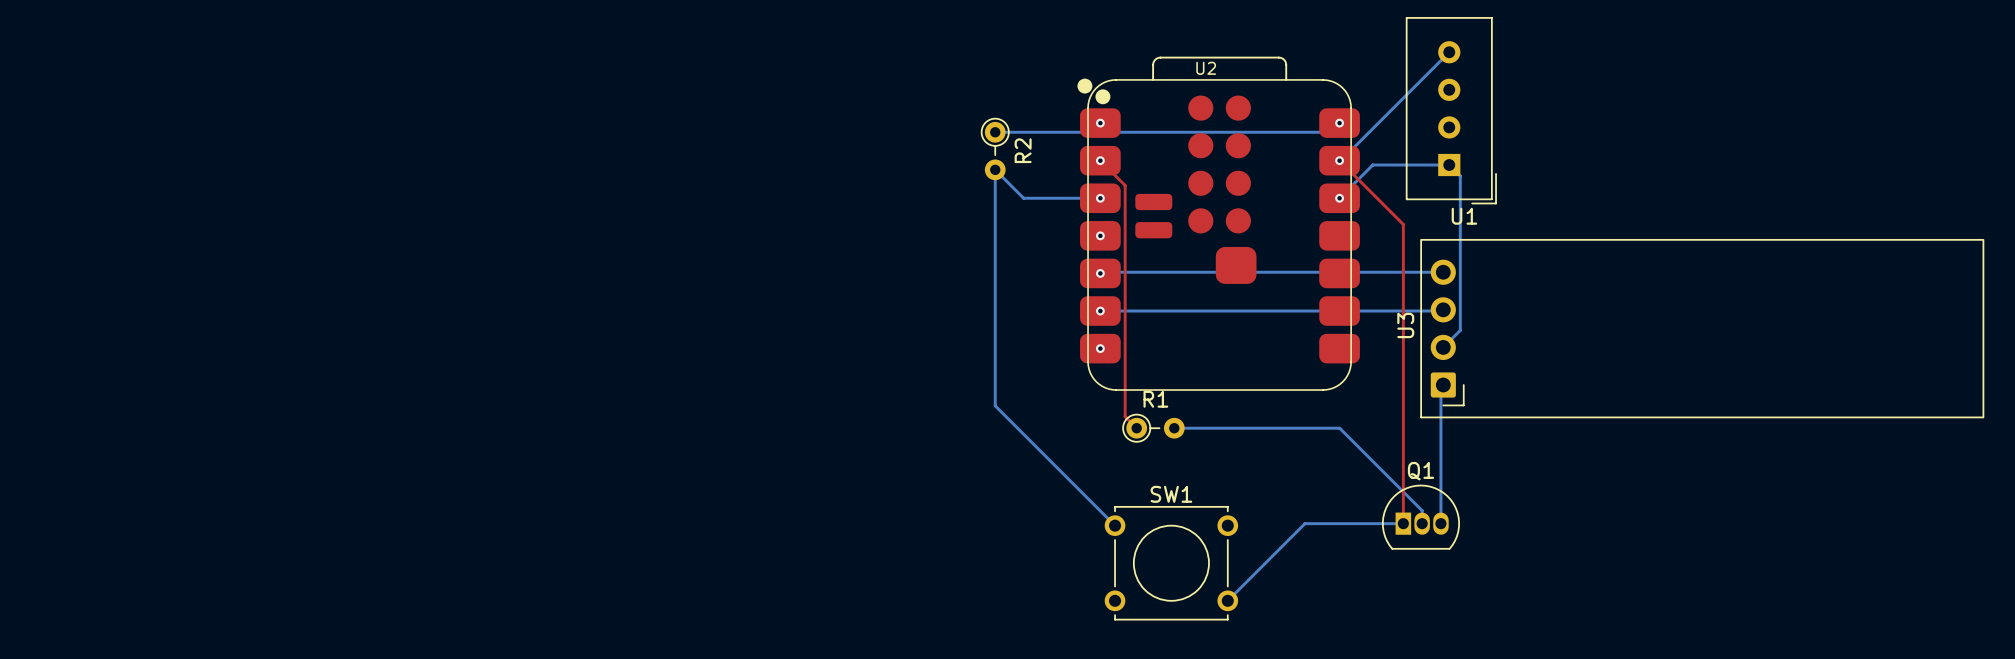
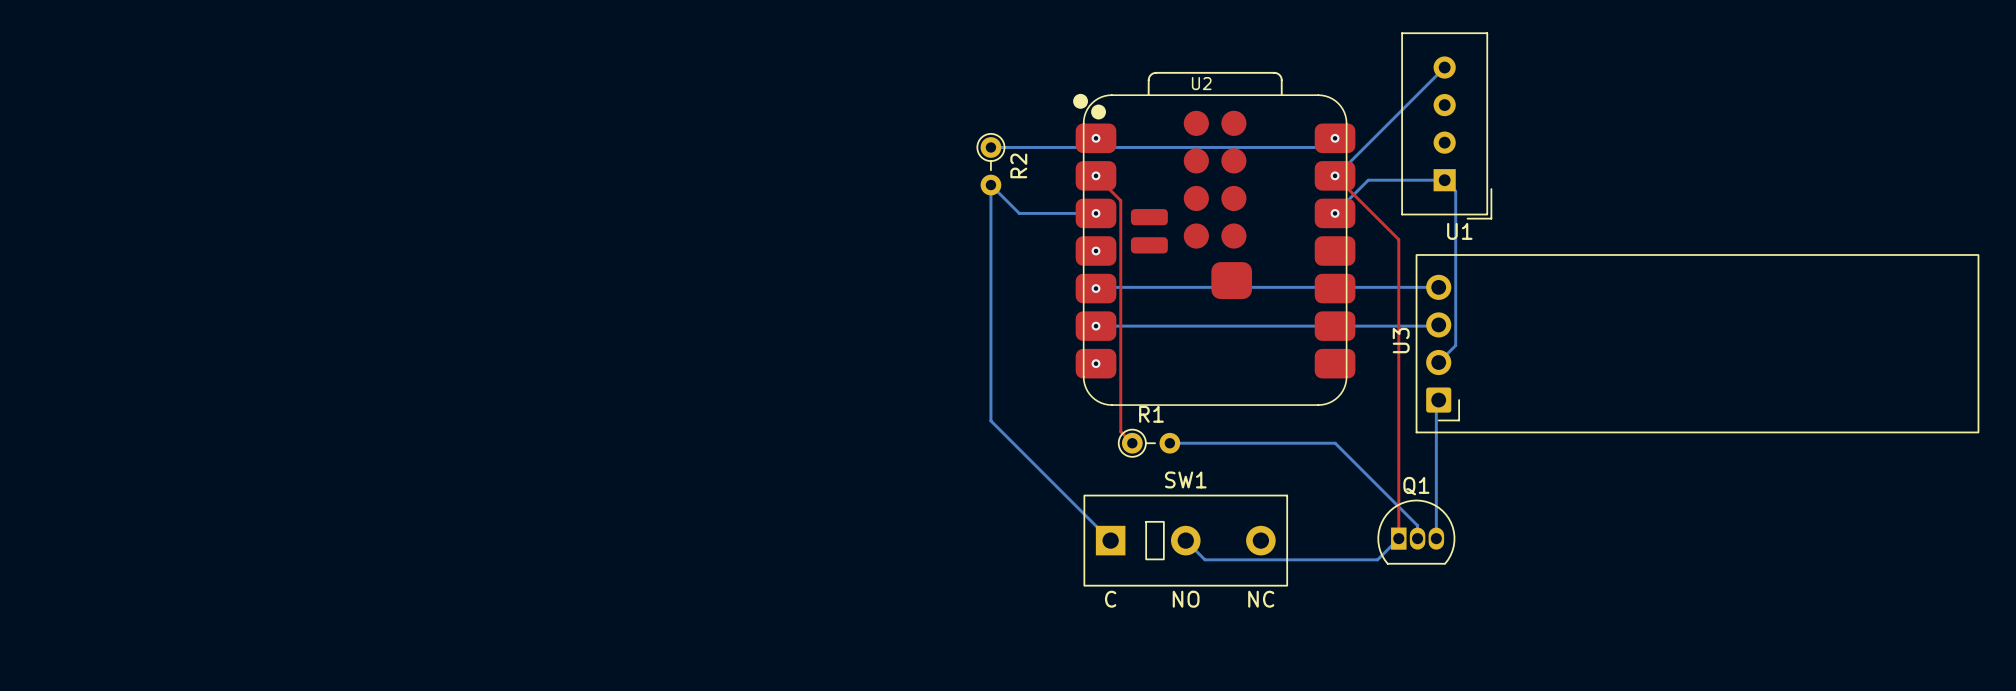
SW1 footprint: [1104, 505, 1239, 621] -> [1083, 494, 1289, 587]
bottom track: (1403, 523) (1304, 523) (1227, 600) -> (1398, 538) (1377, 559) (1204, 559) (1185, 540)

